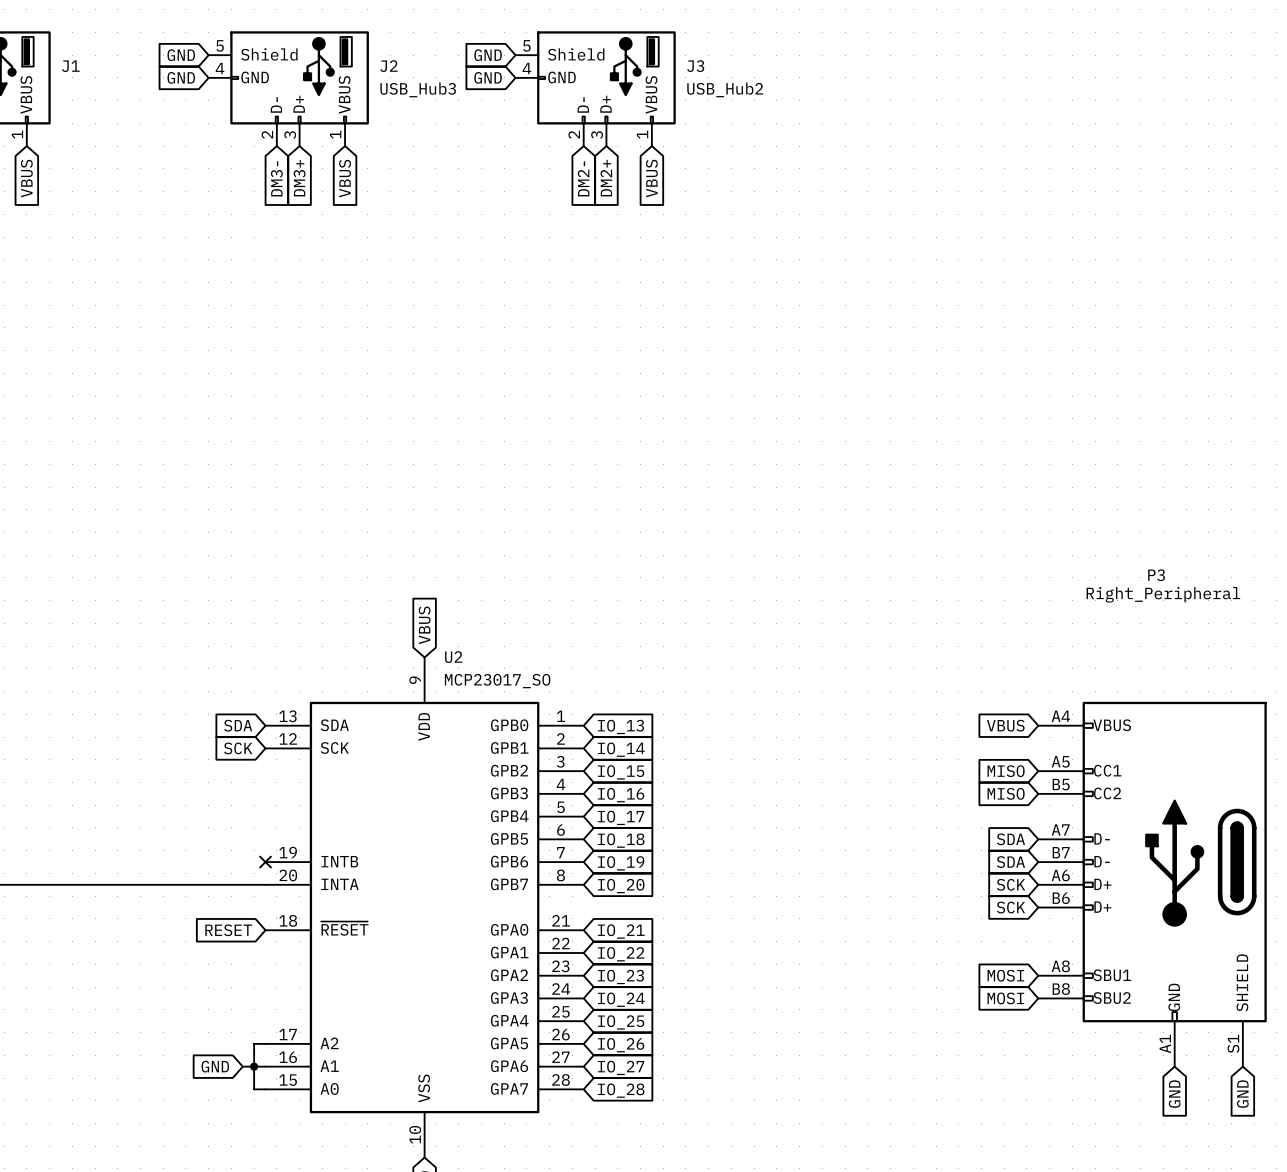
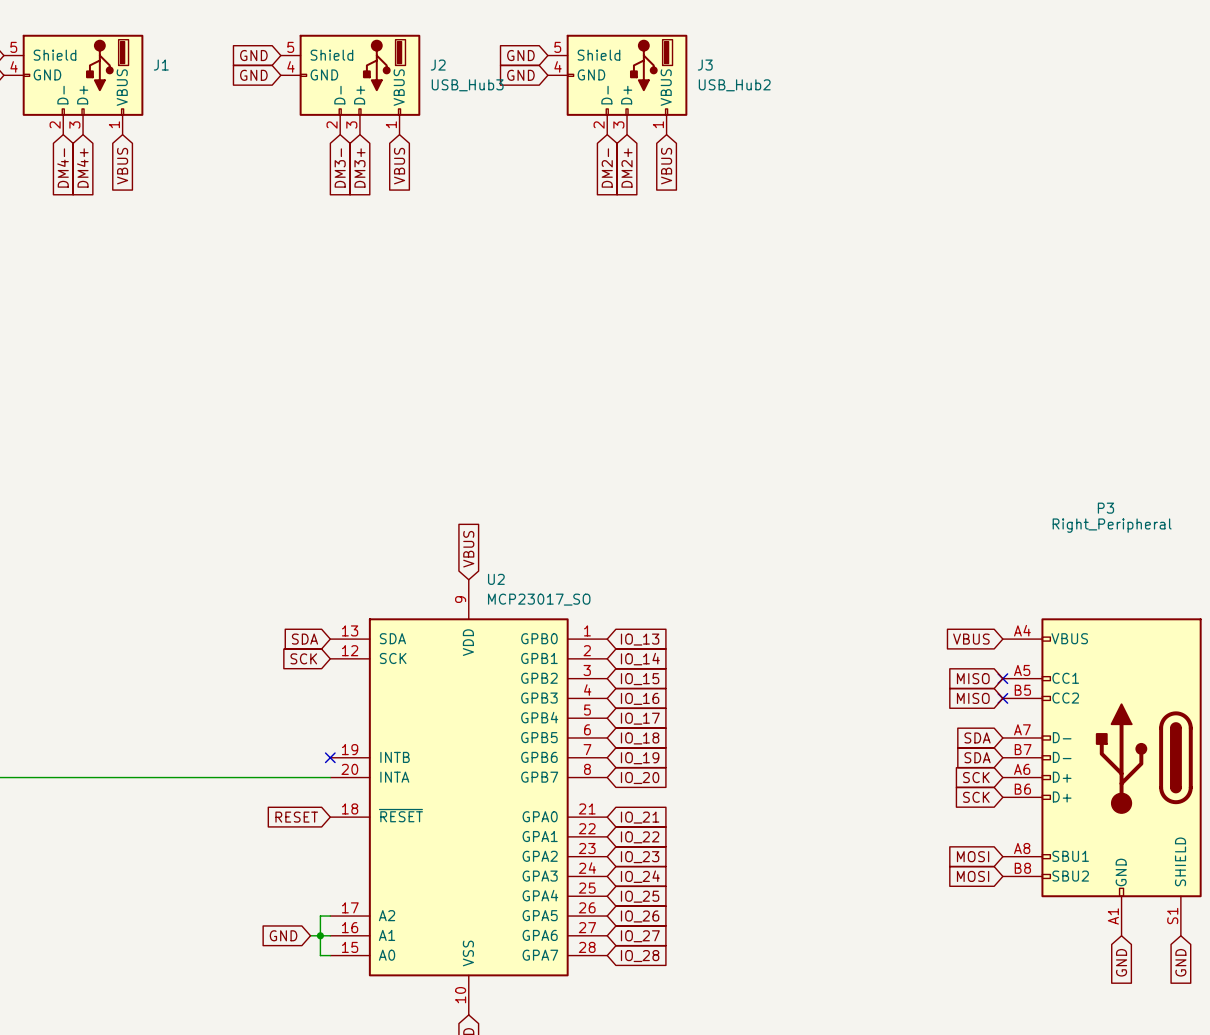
no-connect mark: none -> (1002, 678)
no-connect mark: none -> (1002, 698)

